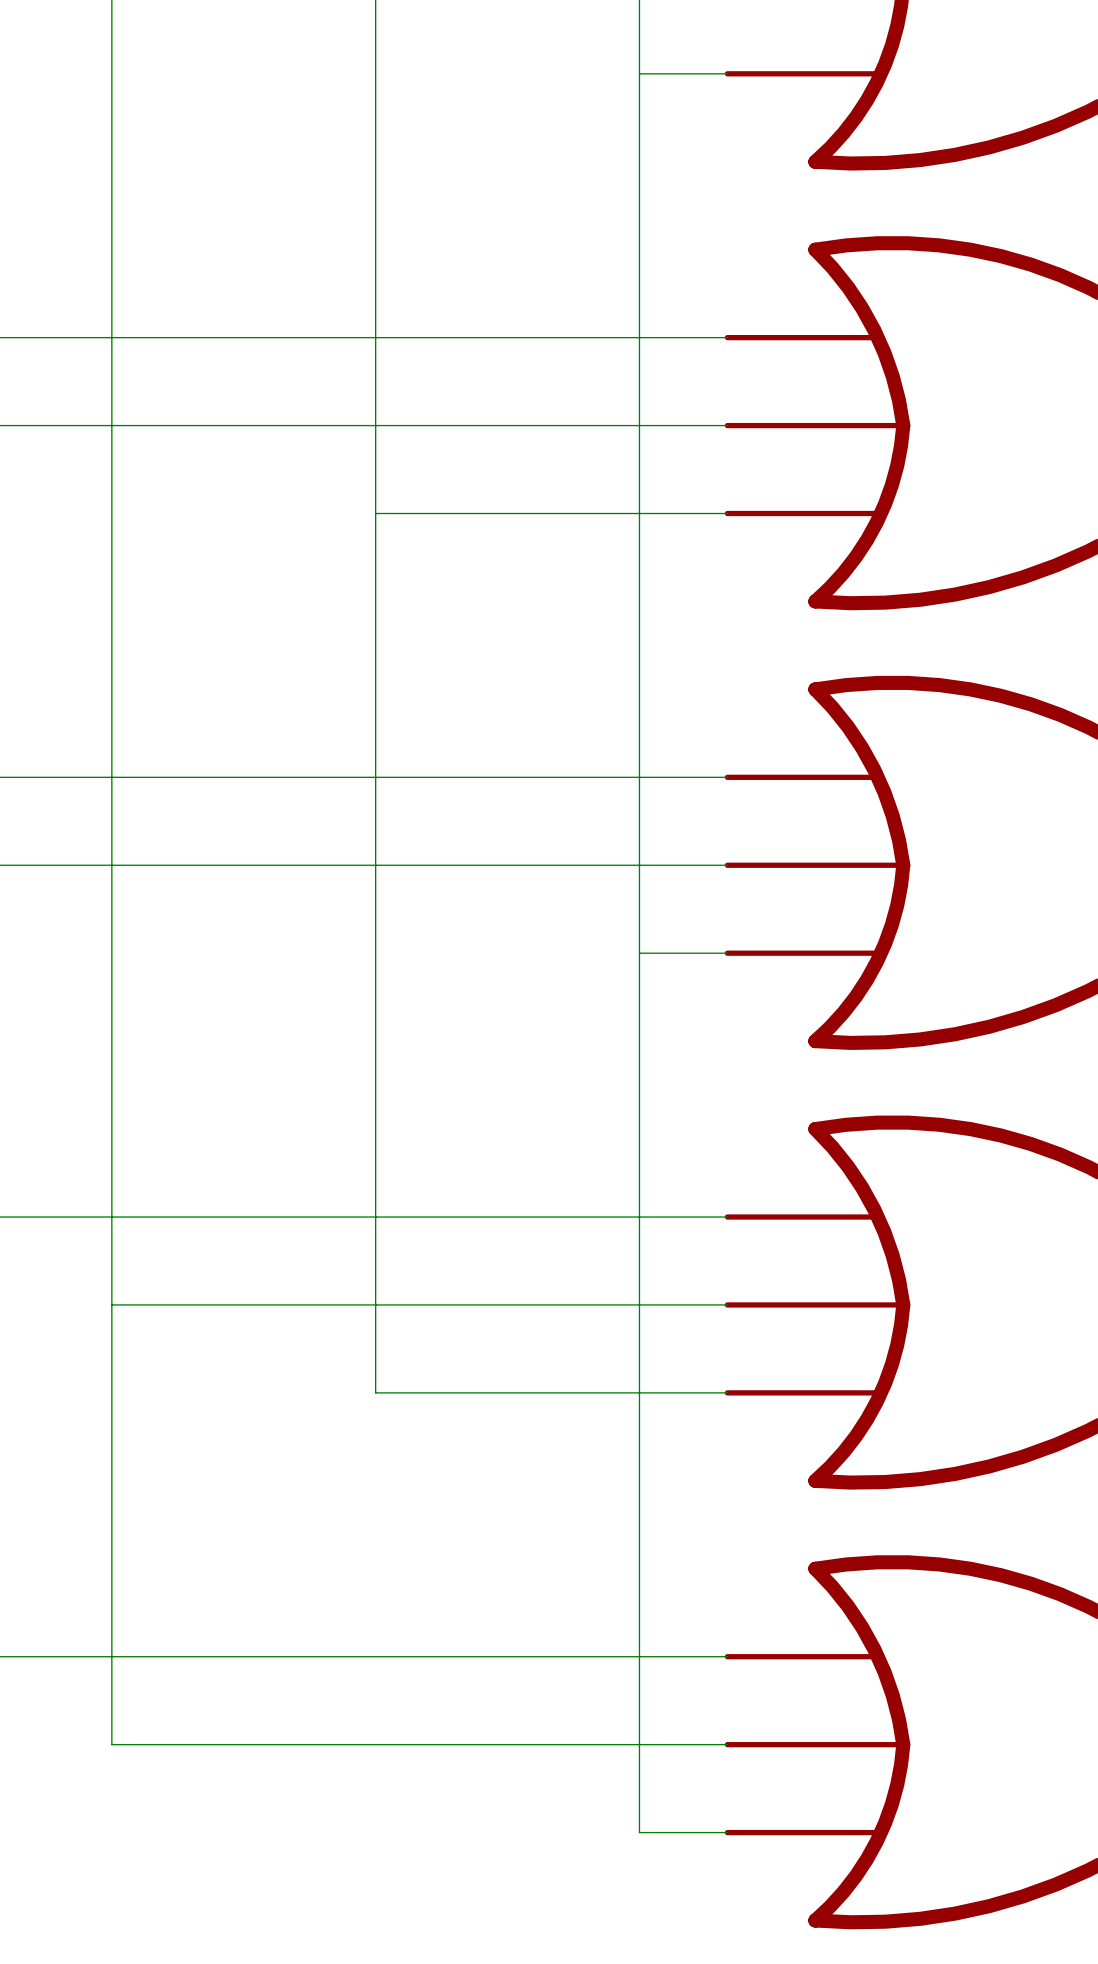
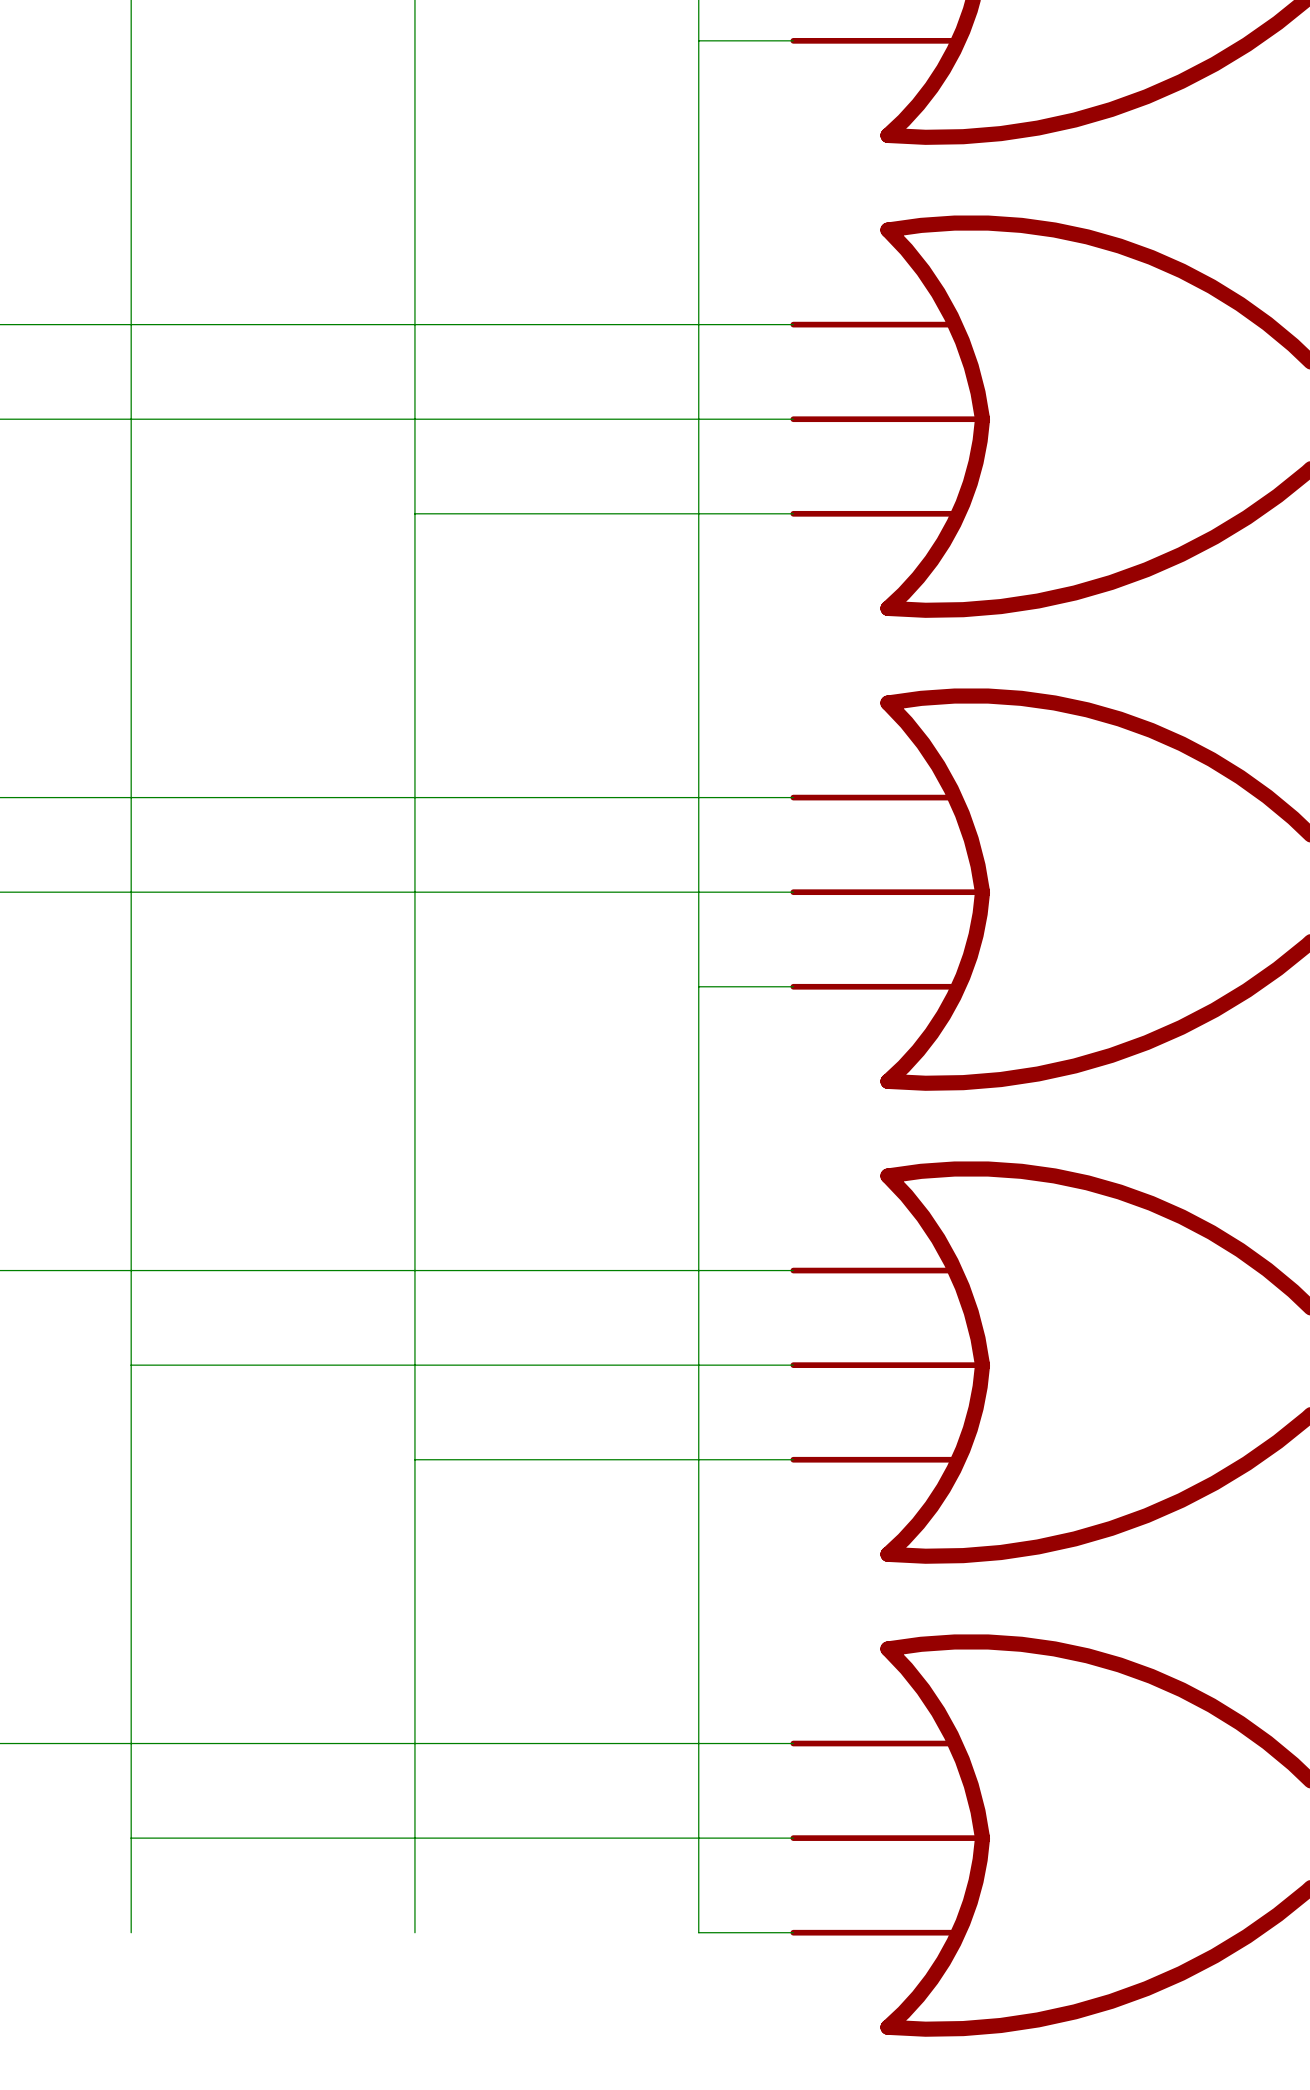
wire: none -> (414, 1459) (414, 1932)
wire: none -> (131, 1838) (131, 1932)

